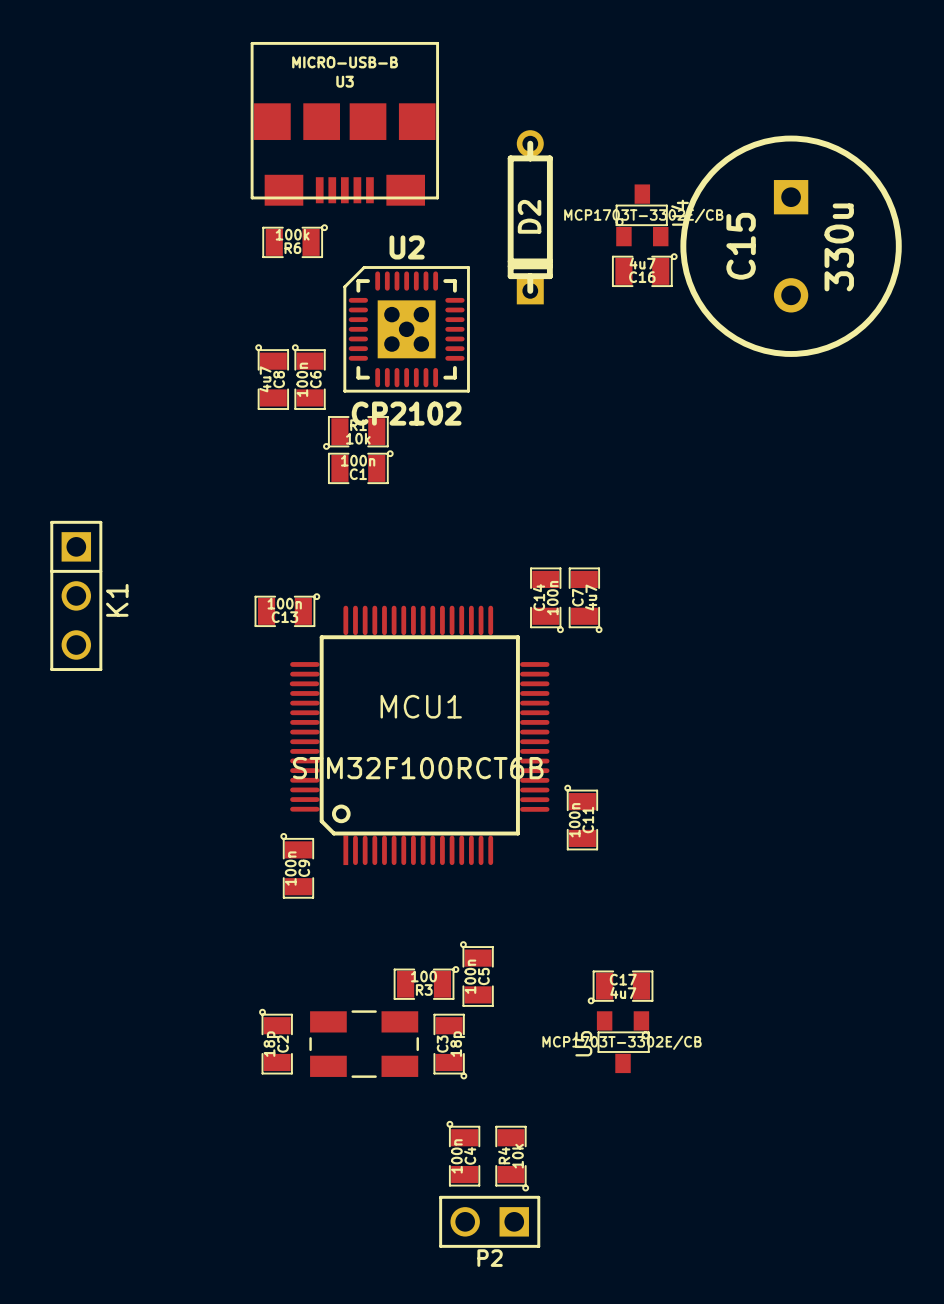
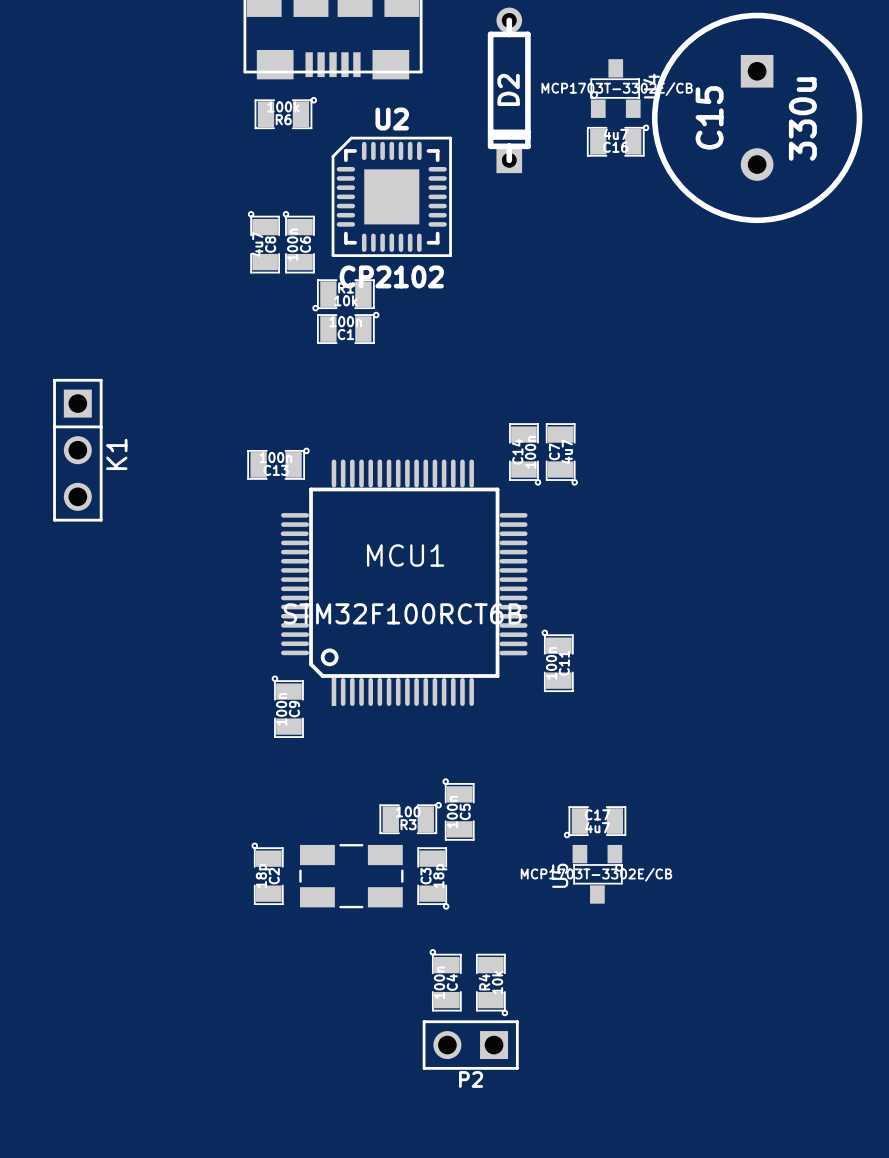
U2 footprint: [343, 266, 470, 393] -> [331, 136, 452, 257]

